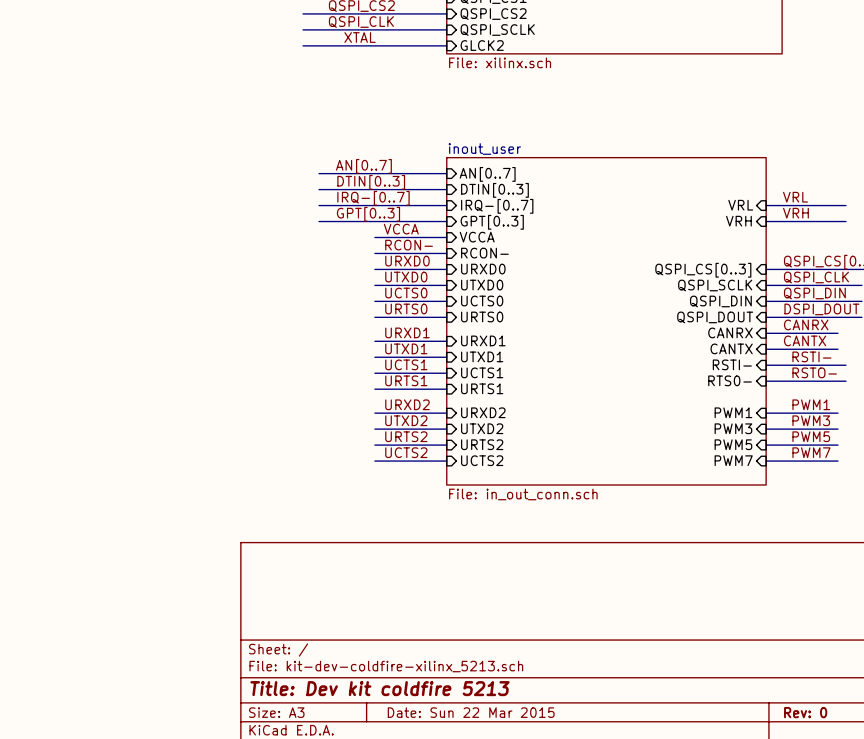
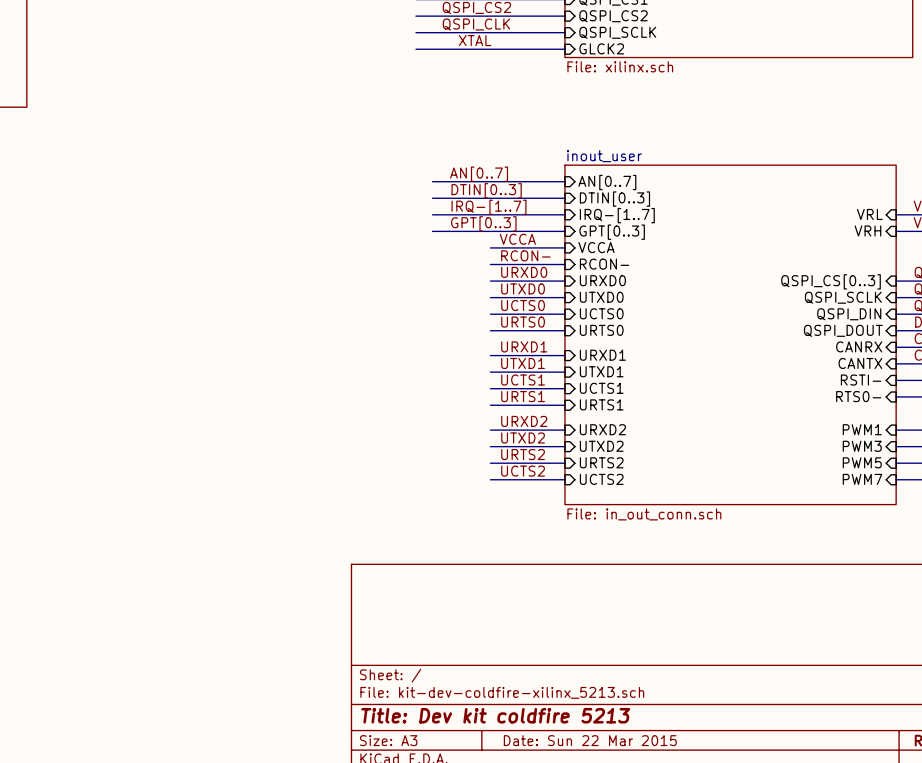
label: IRQ-[0..7] (373, 198) -> IRQ-[1..7] (488, 207)
sheet pin: IRQ-[0..7] (497, 206) -> IRQ-[1..7] (617, 215)

